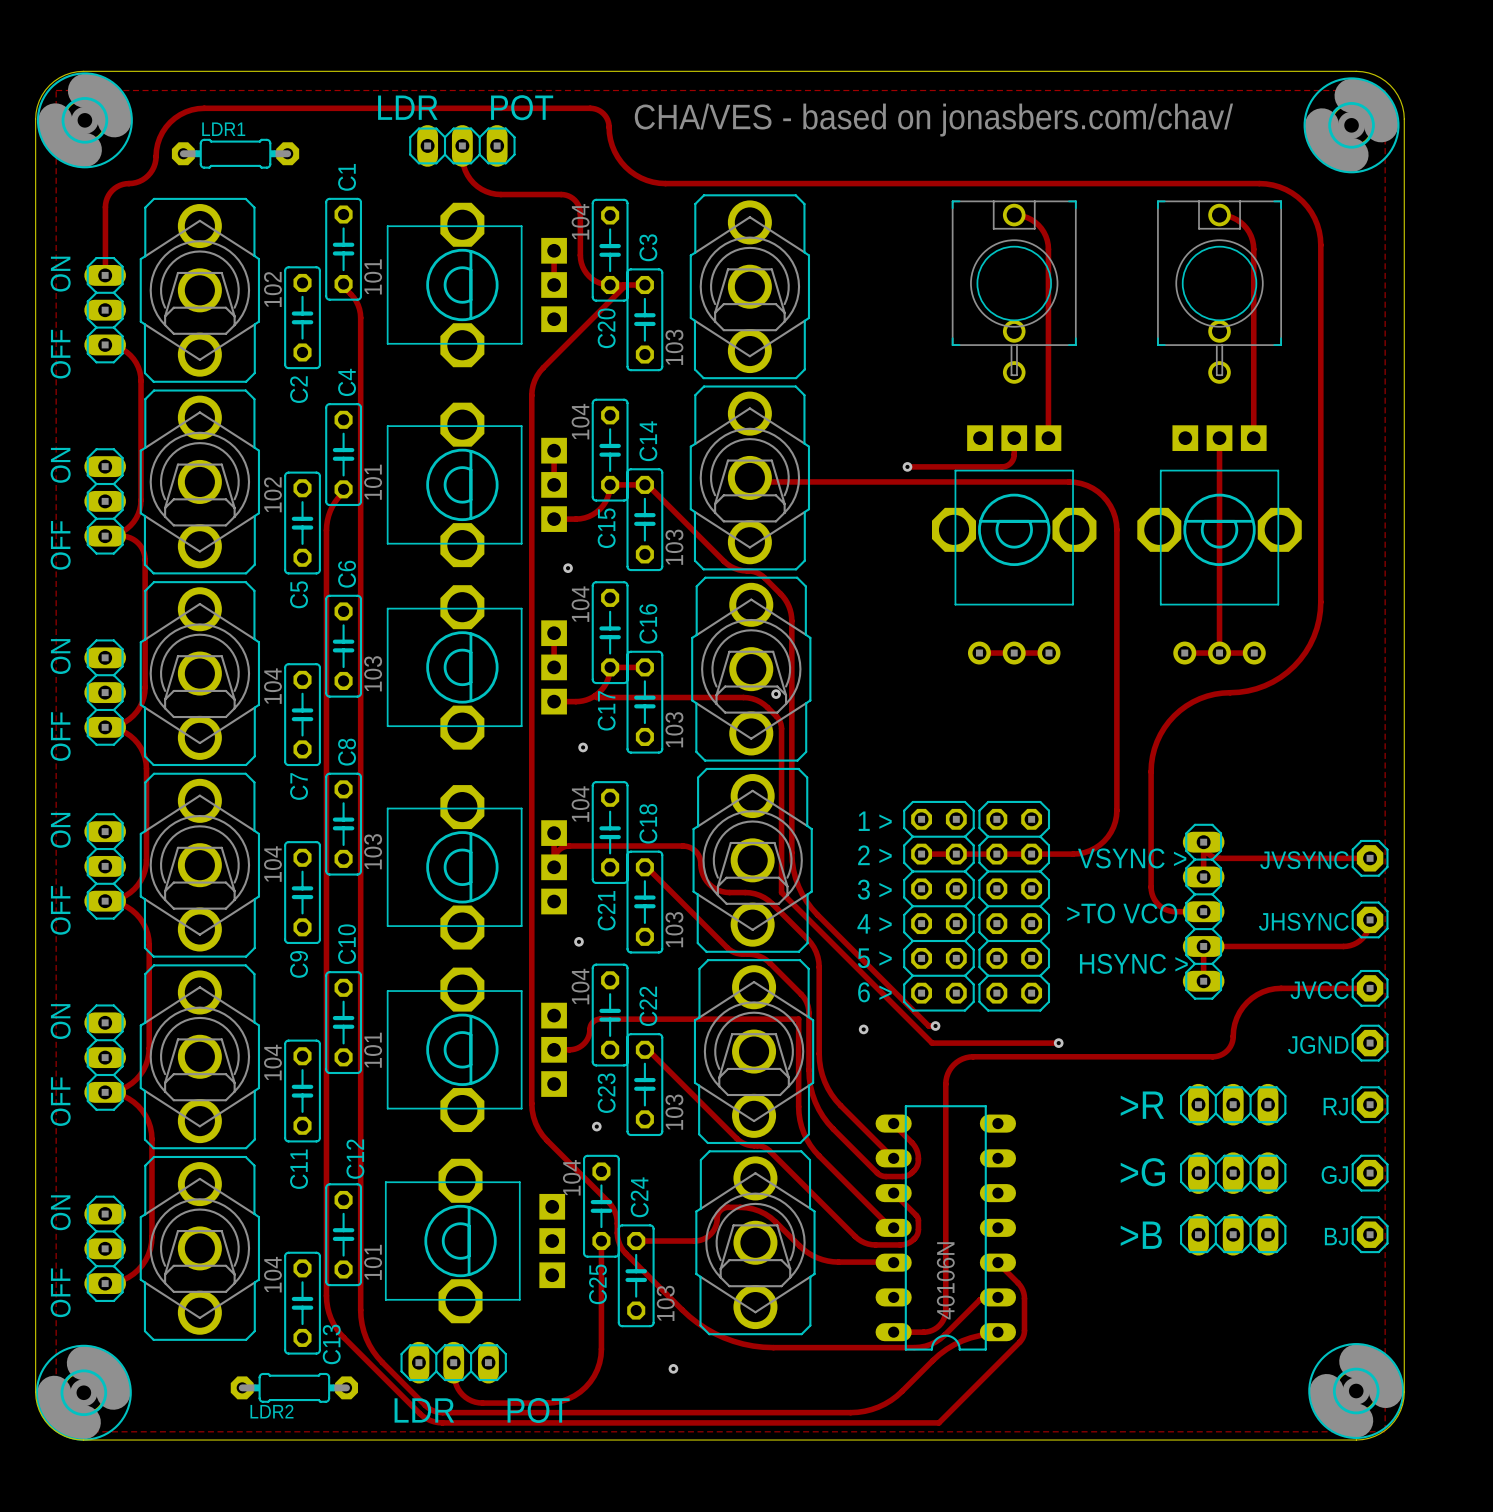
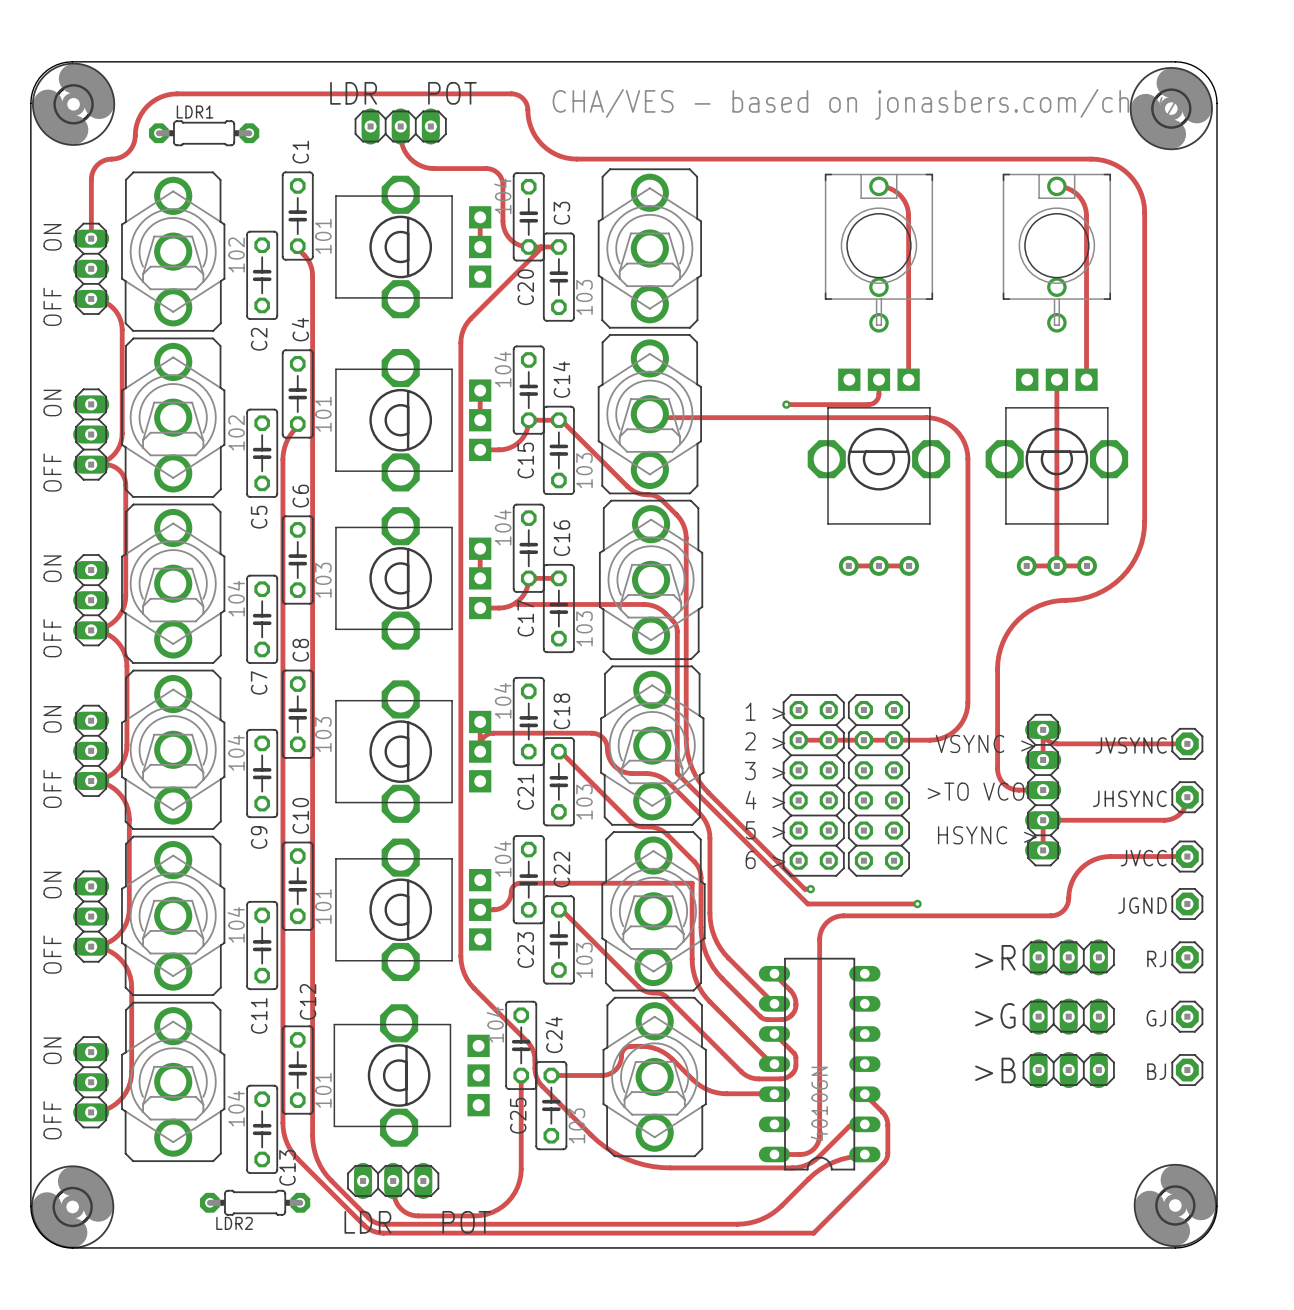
zone outline: (56, 90) (1385, 90) (1385, 1431) (56, 1431) (56, 90) -> none
via: (568, 568) -> none
via: (776, 694) -> none
via: (583, 747) -> none
via: (578, 941) -> none
via: (863, 1029) -> none
via: (596, 1126) -> none
via: (673, 1368) -> none

